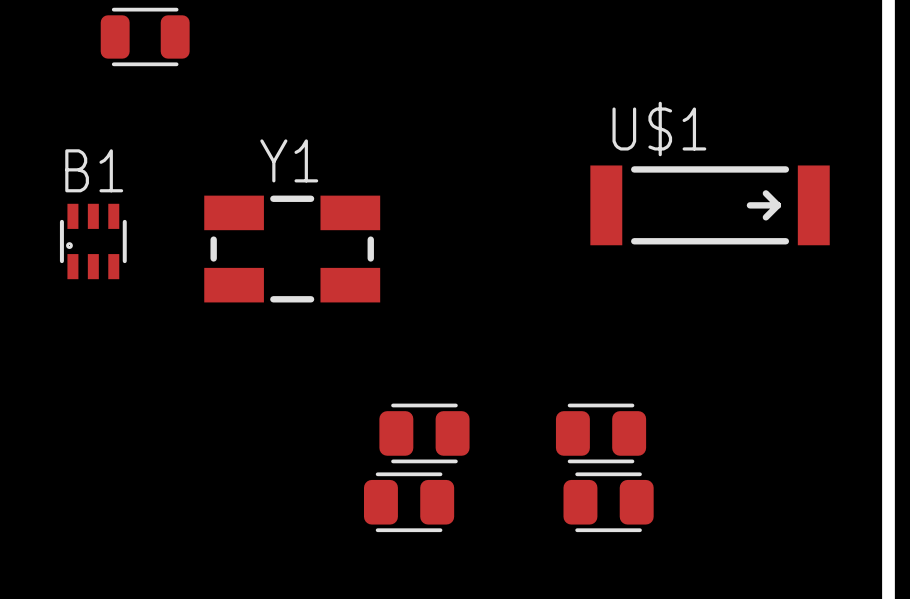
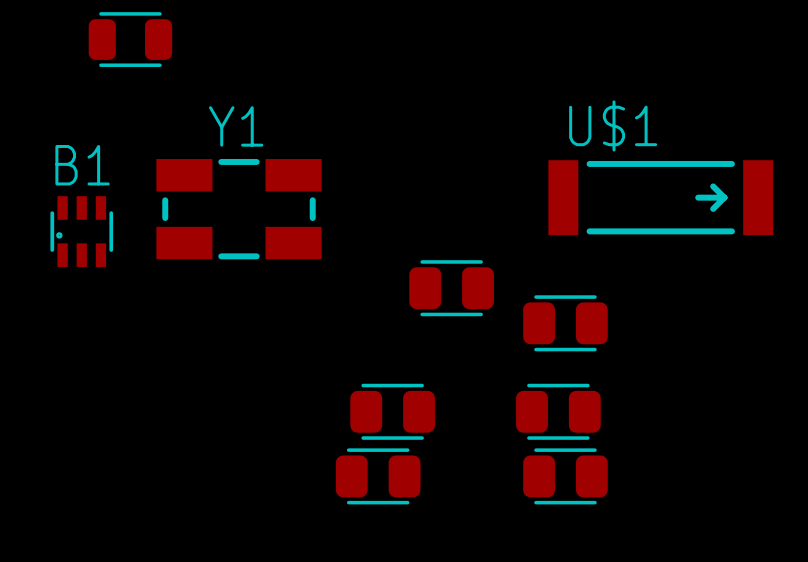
Y1 position: (292, 249) -> (238, 209)
part: none -> (451, 288)
part: none -> (565, 323)

